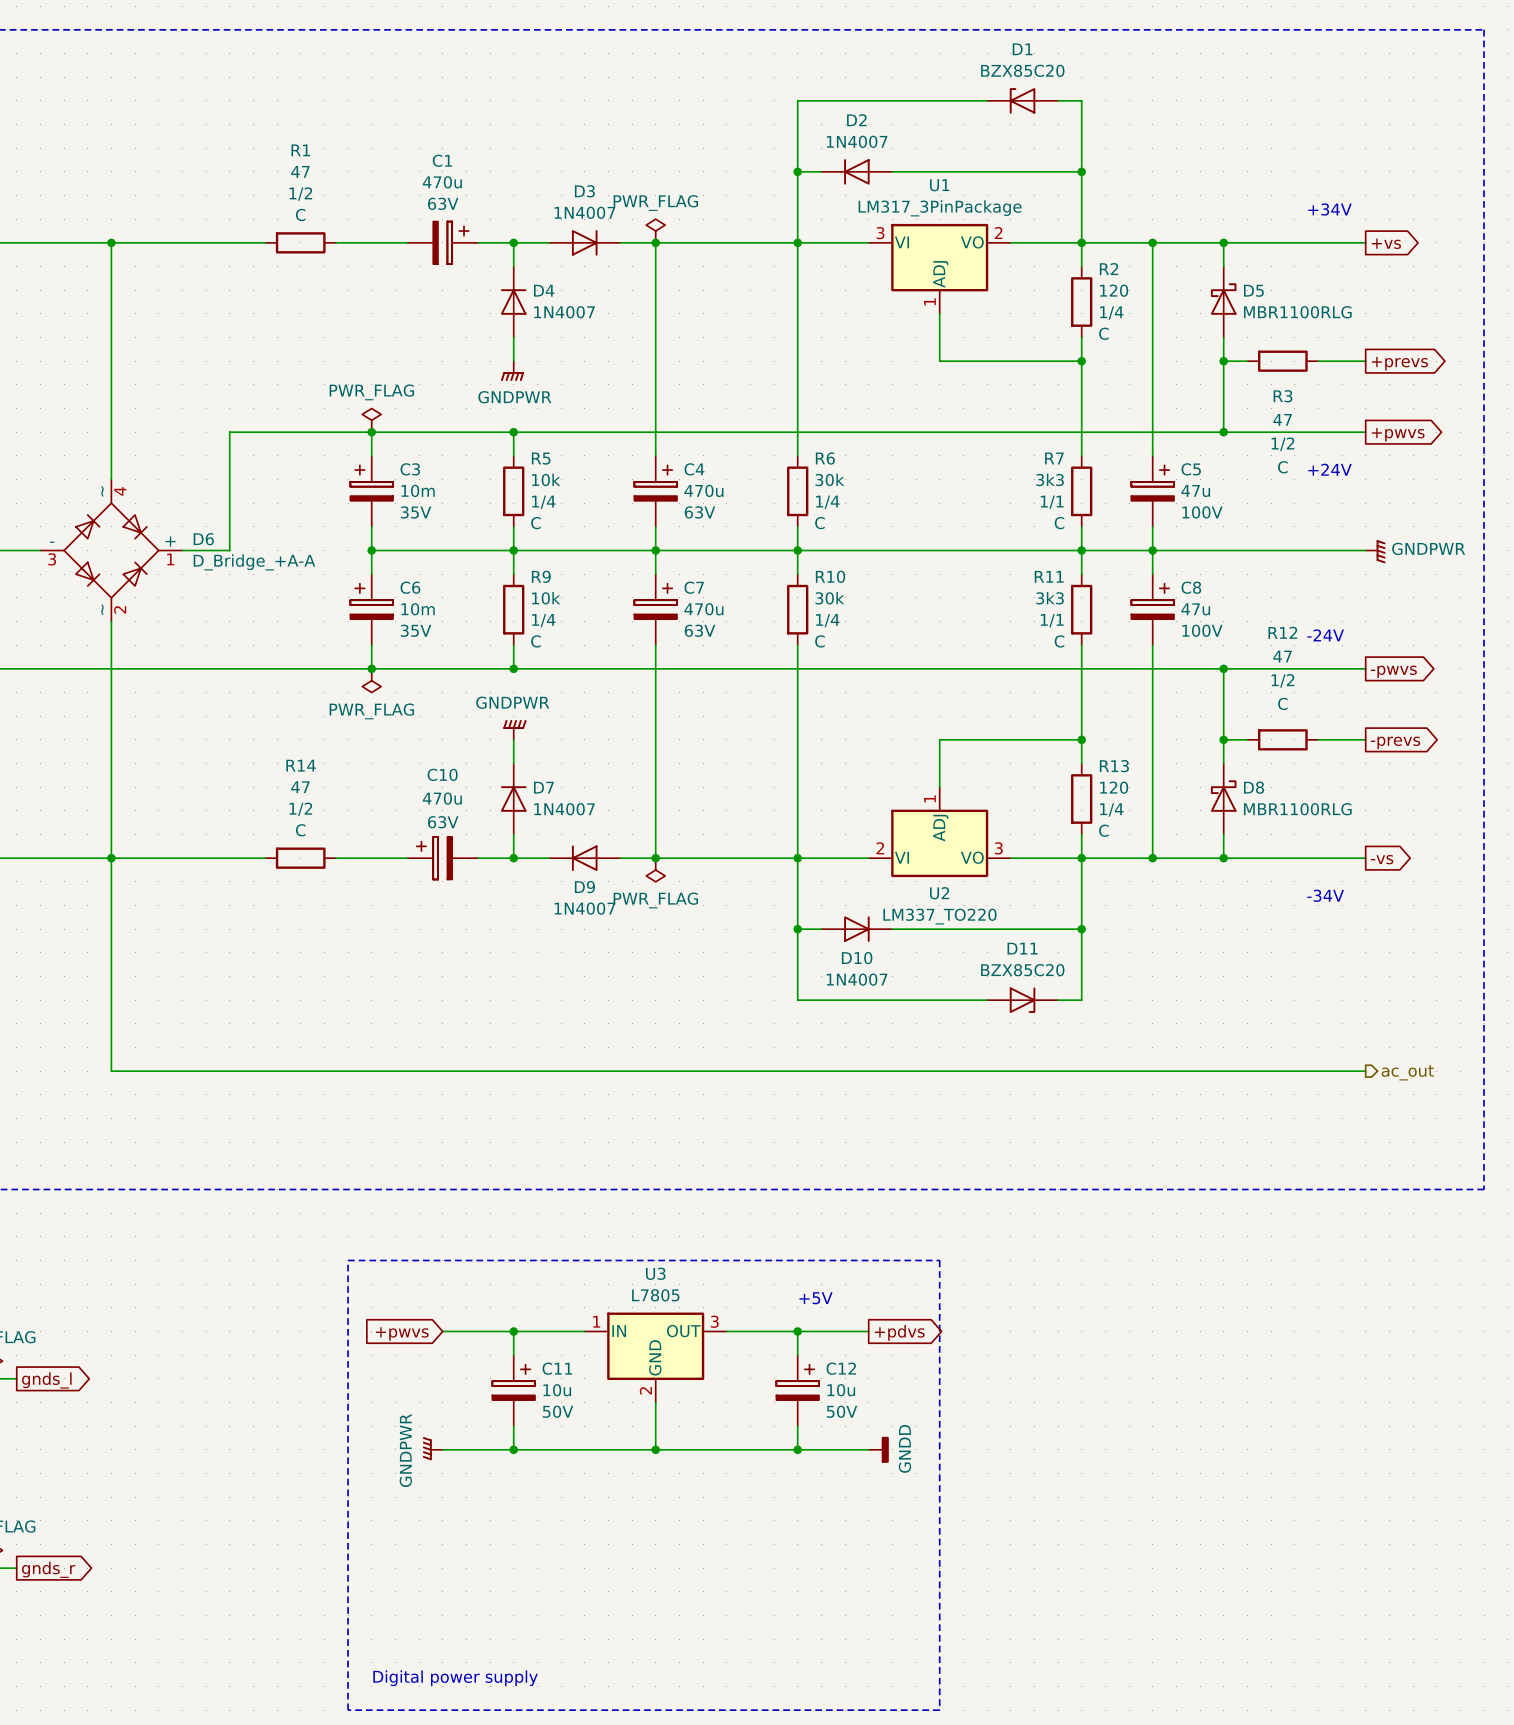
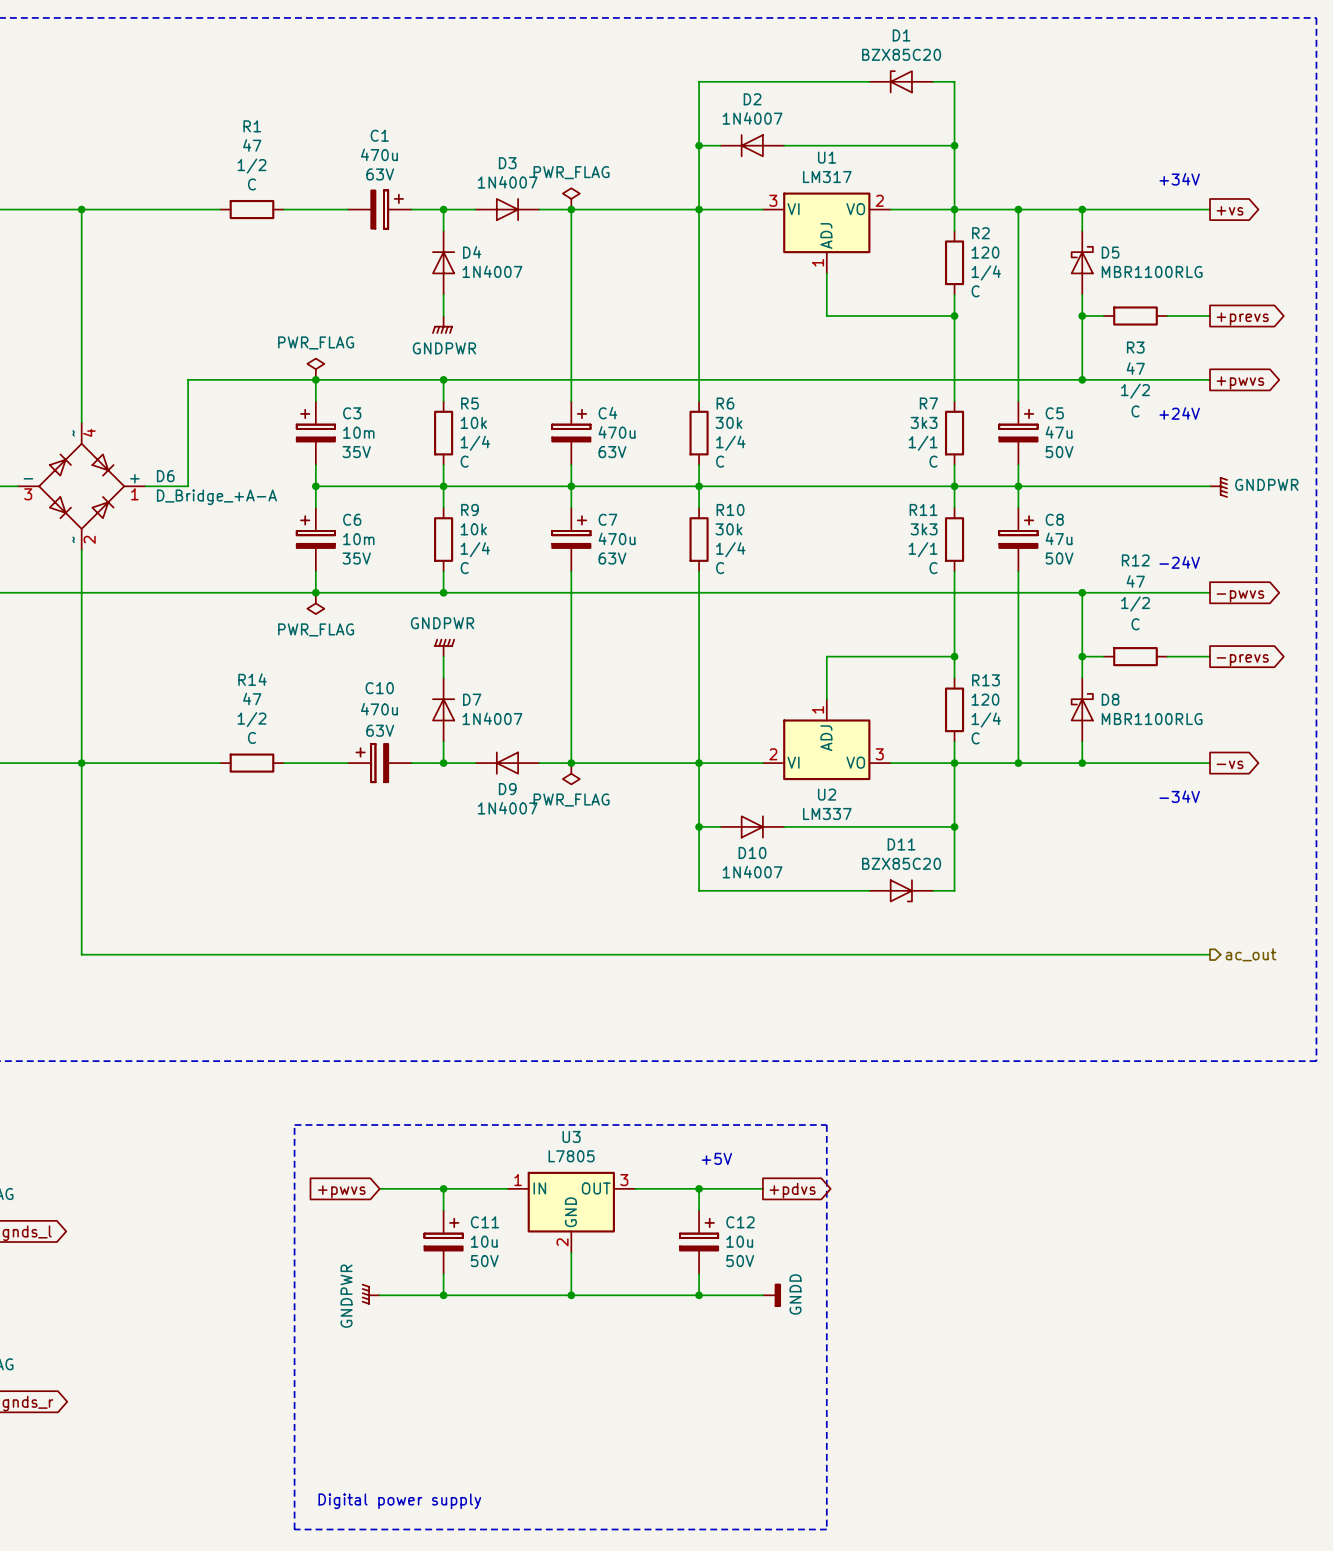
U1 value: LM317_3PinPackage (940, 208) -> LM317 (827, 177)
C5 text: 100V (1202, 512) -> 50V (1059, 452)
C8 text: 100V (1202, 630) -> 50V (1059, 558)
U2 value: LM337_TO220 (939, 916) -> LM337 (827, 813)

